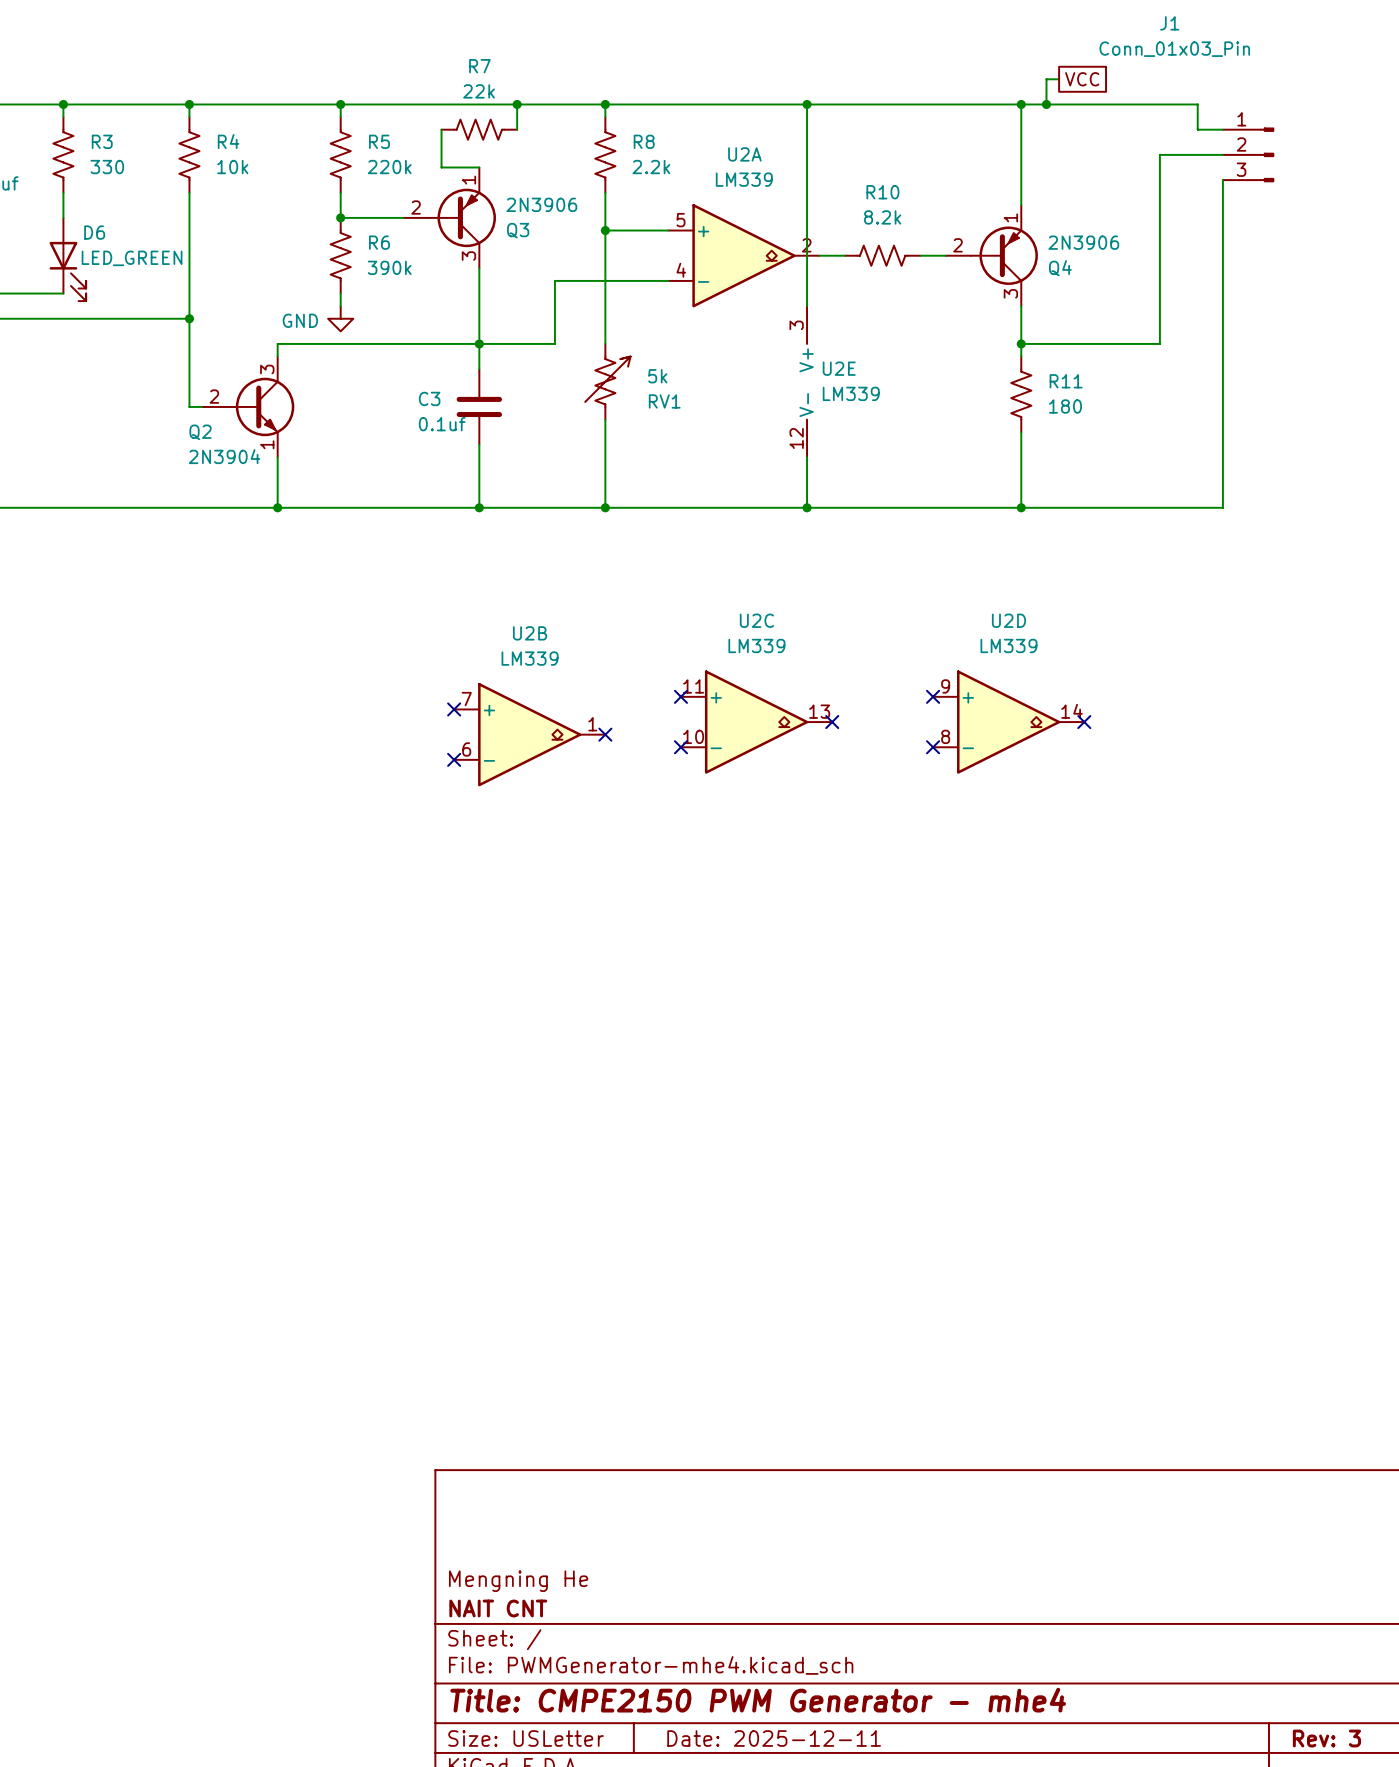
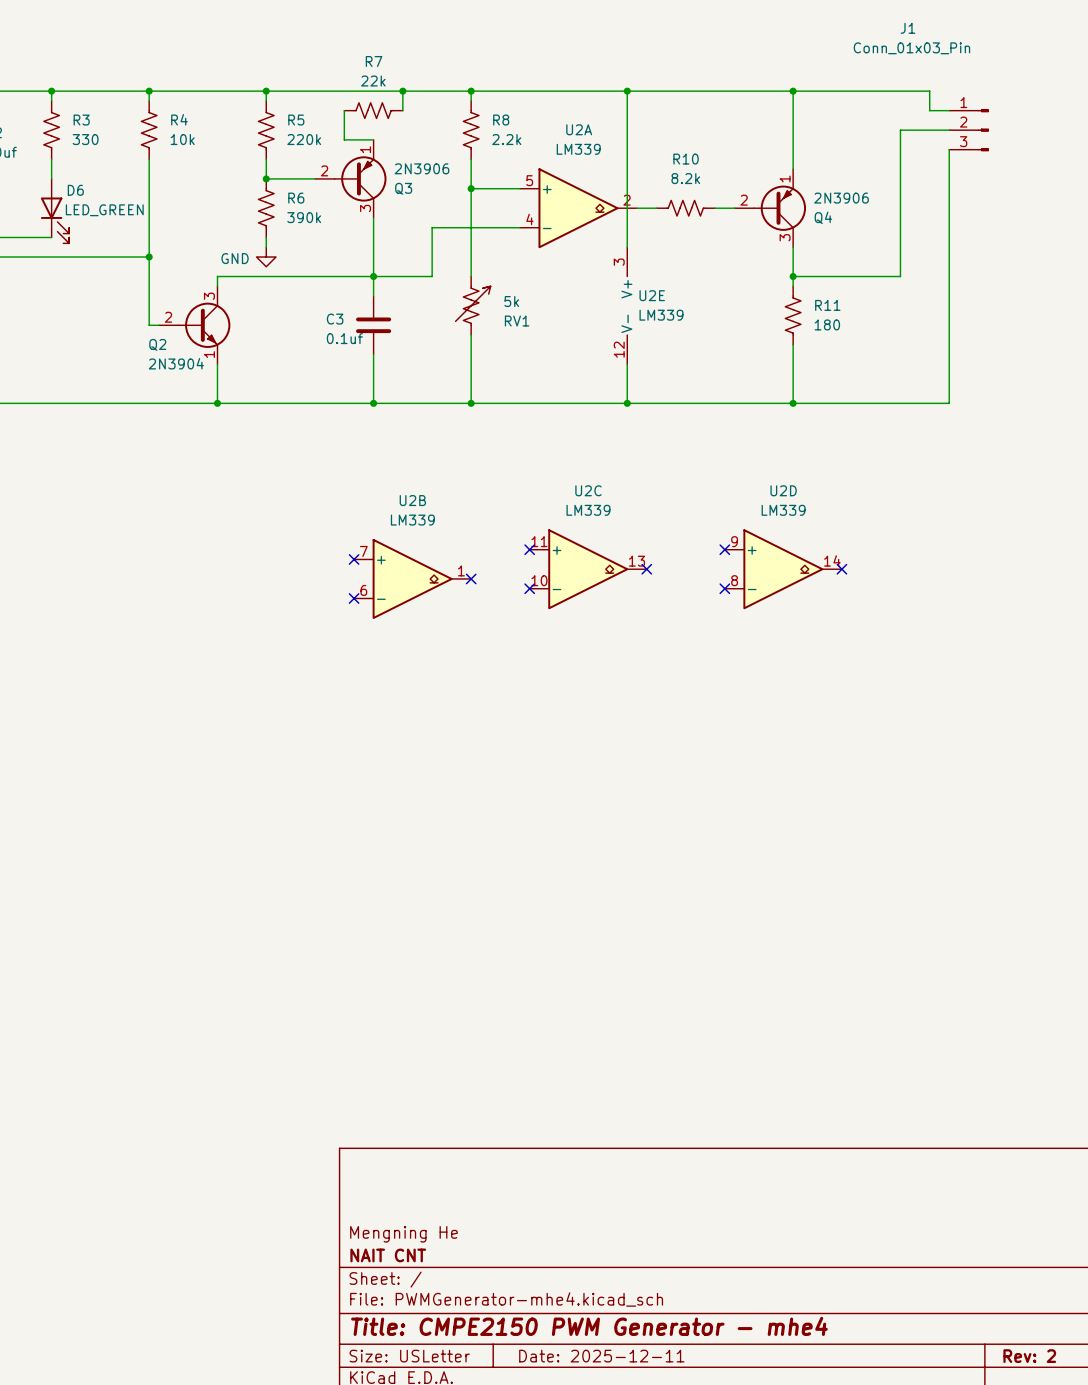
wire: (1059, 79) (1046, 79) (1046, 104) -> none
global label: VCC (1082, 79) -> none
junction: (1046, 104) -> none
title block: Rev: 3 (1326, 1738) -> Rev: 2 (1029, 1356)

